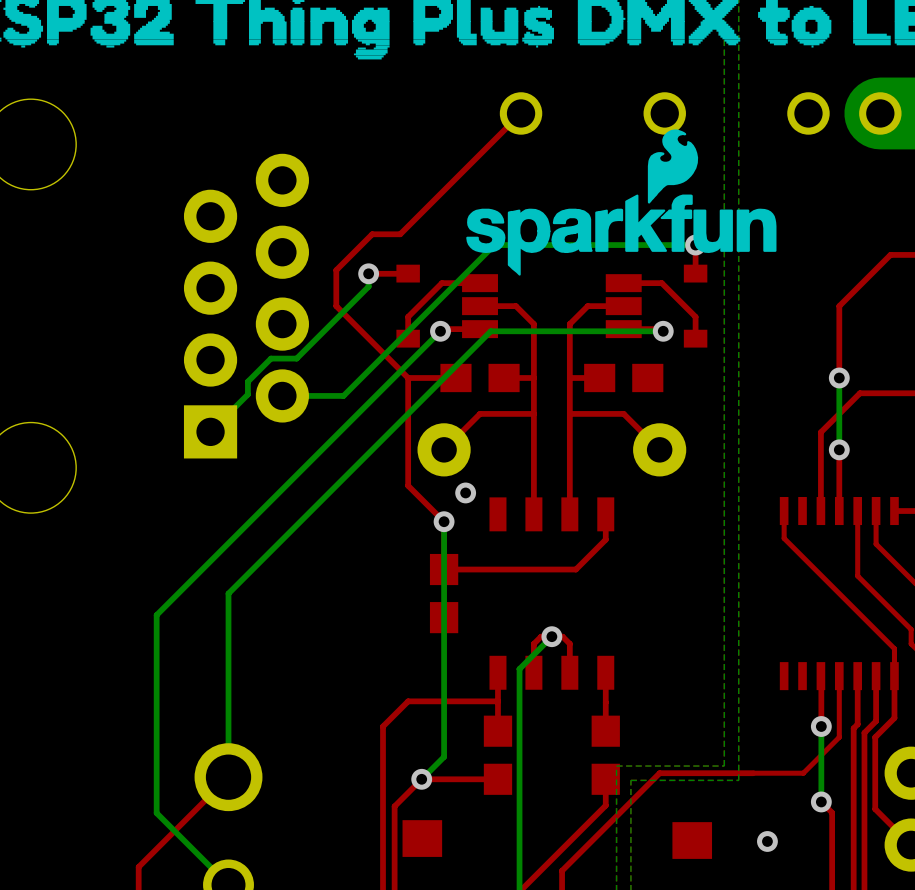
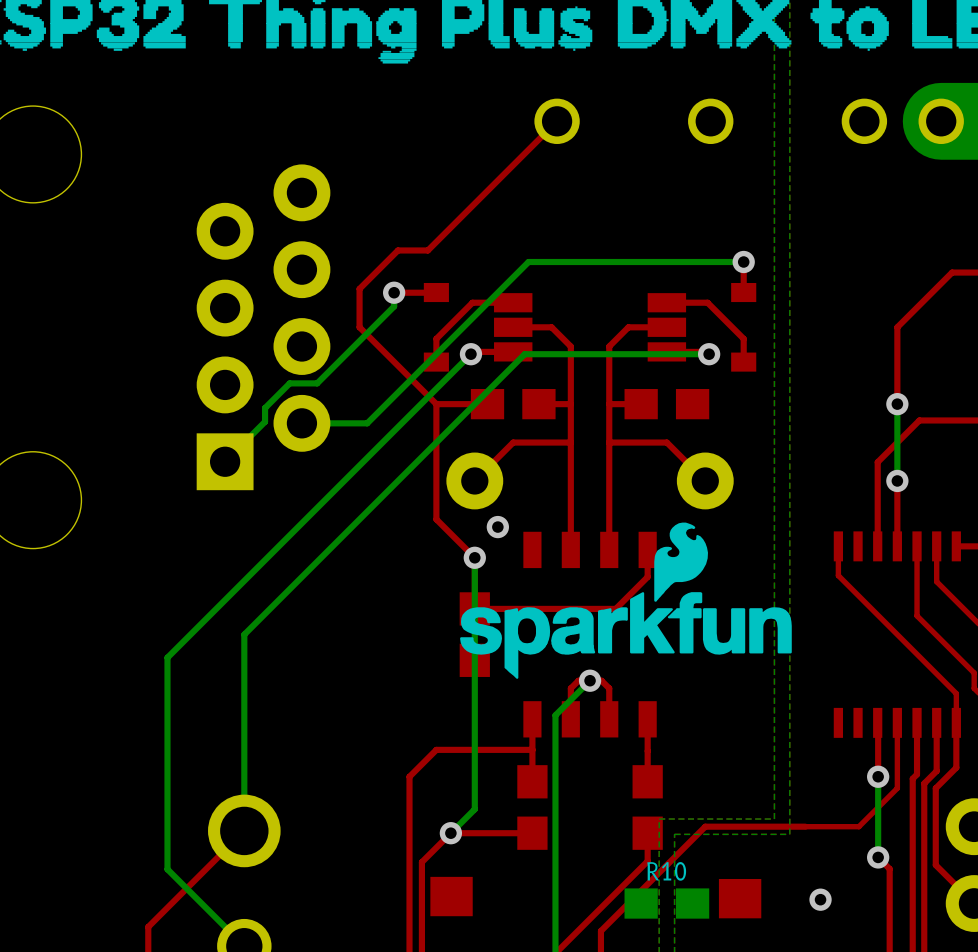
drawing position: (621, 202) -> (625, 600)
R10: none -> (666, 903)

